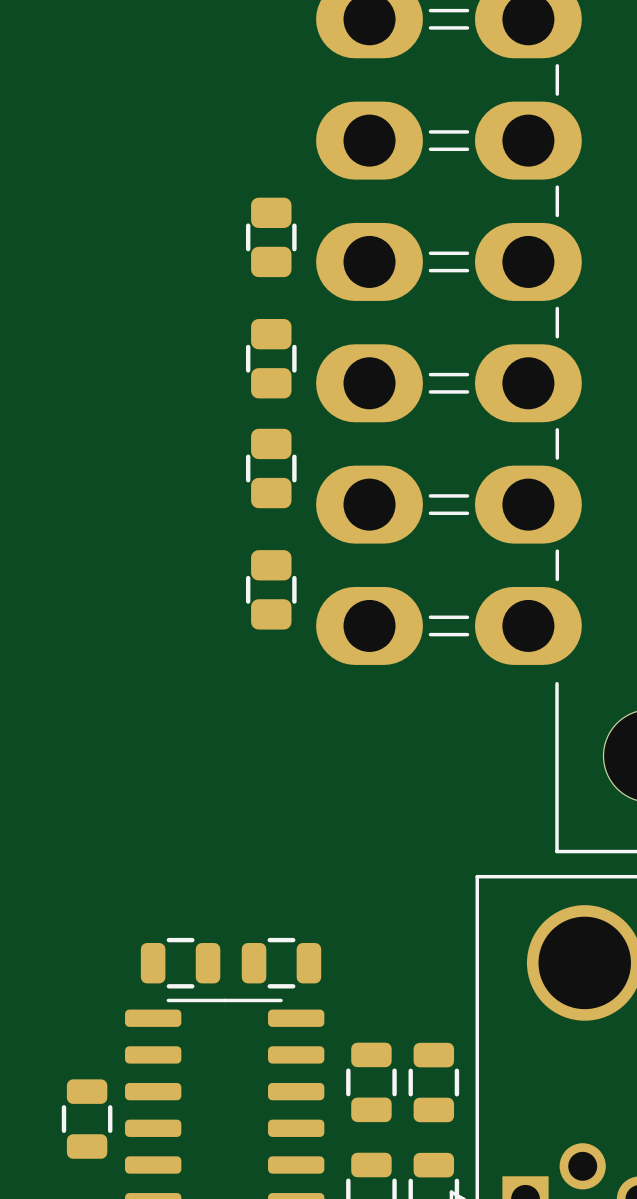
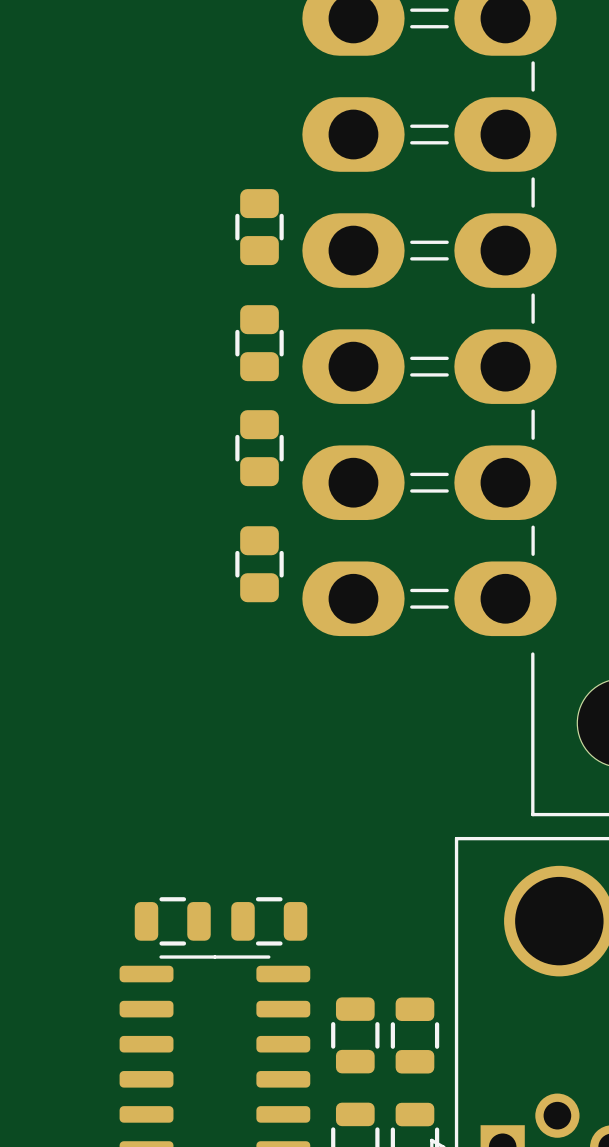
part: (87, 1119) -> none

